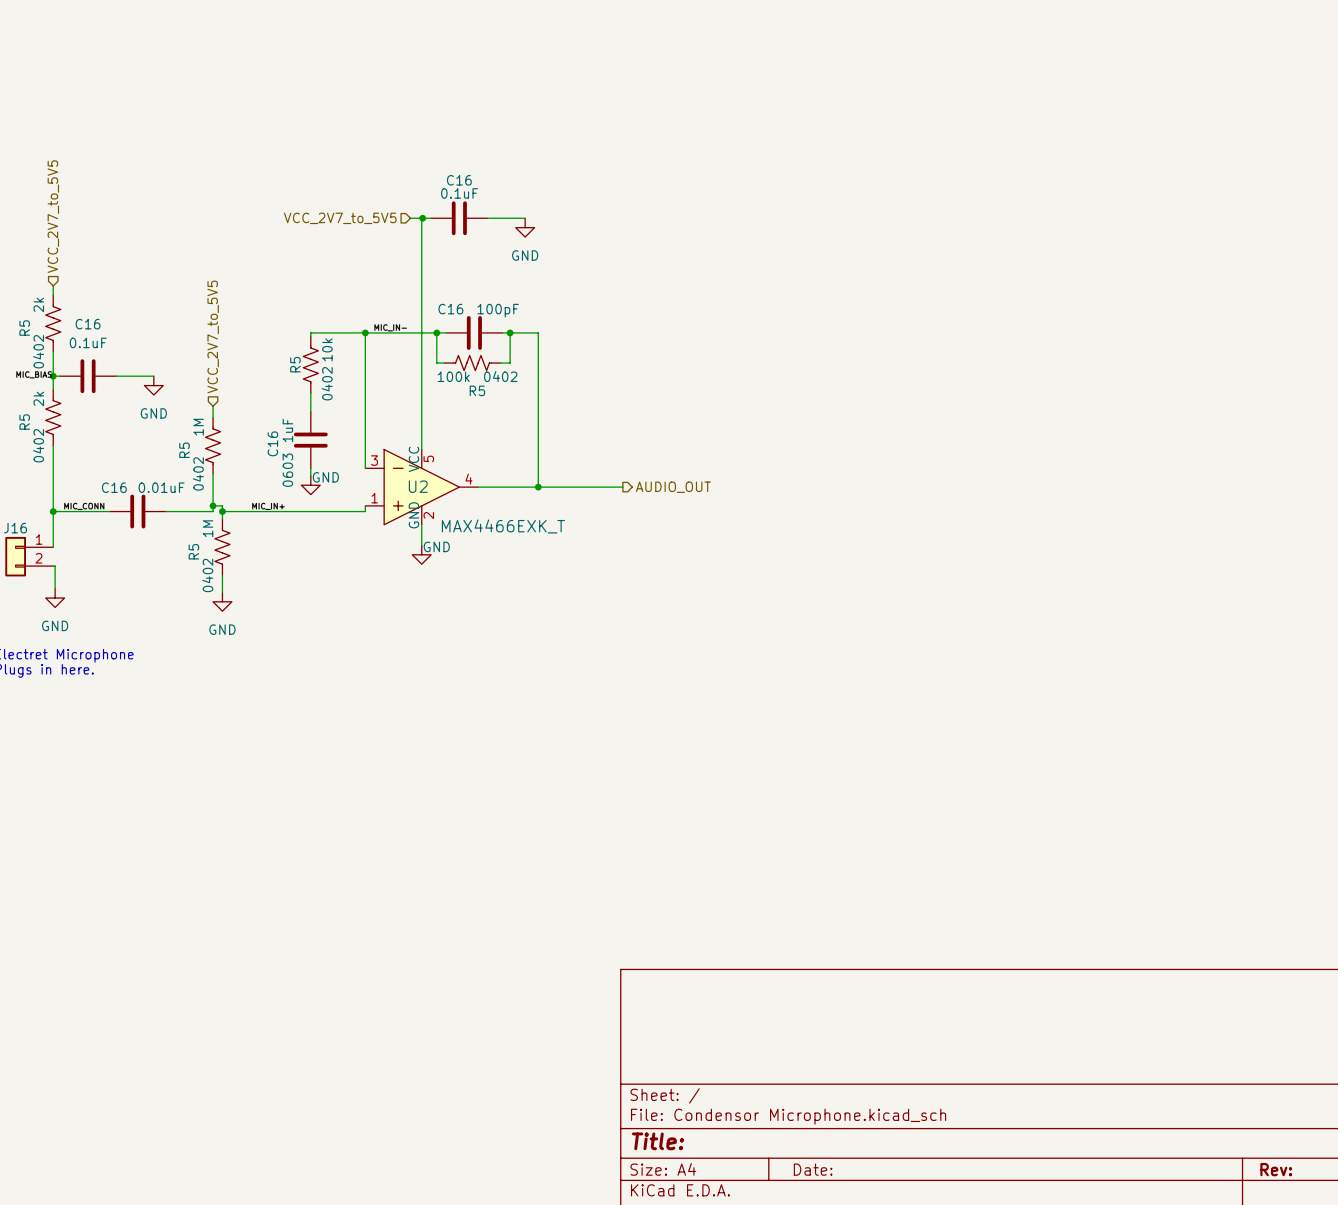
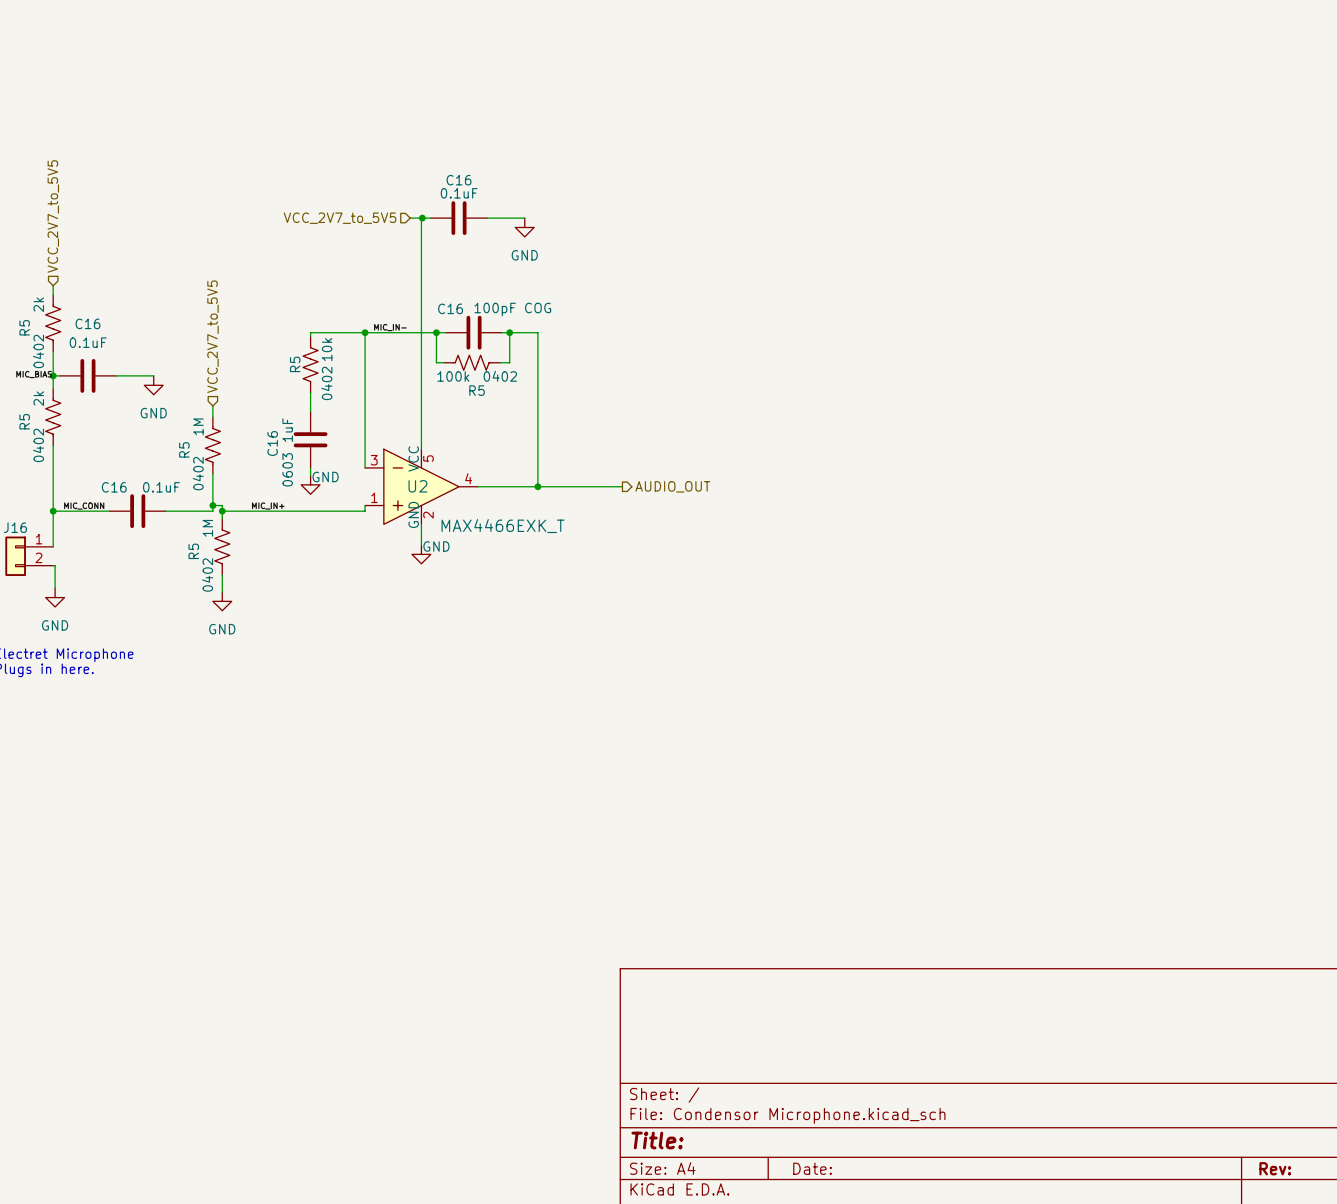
C16 value: 100pF (498, 310) -> 100pF COG (512, 309)
C16 value: 0.01uF (161, 487) -> 0.1uF (161, 487)

